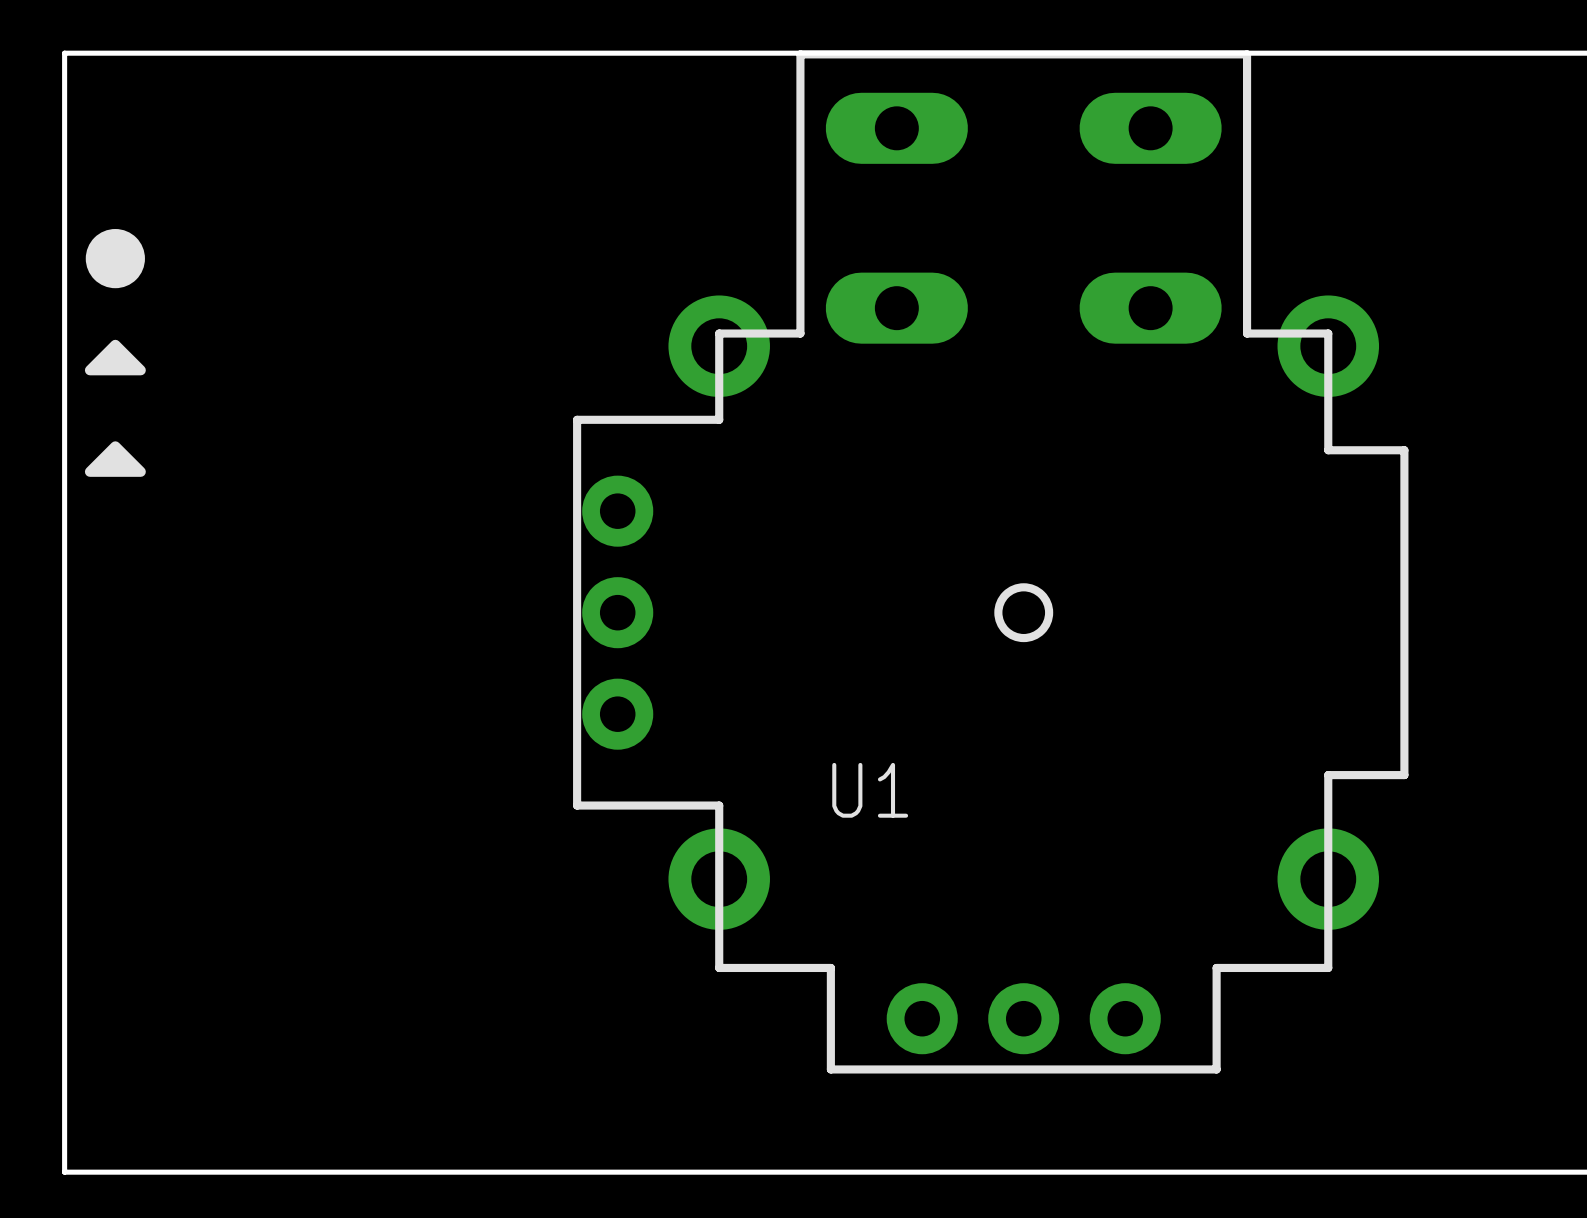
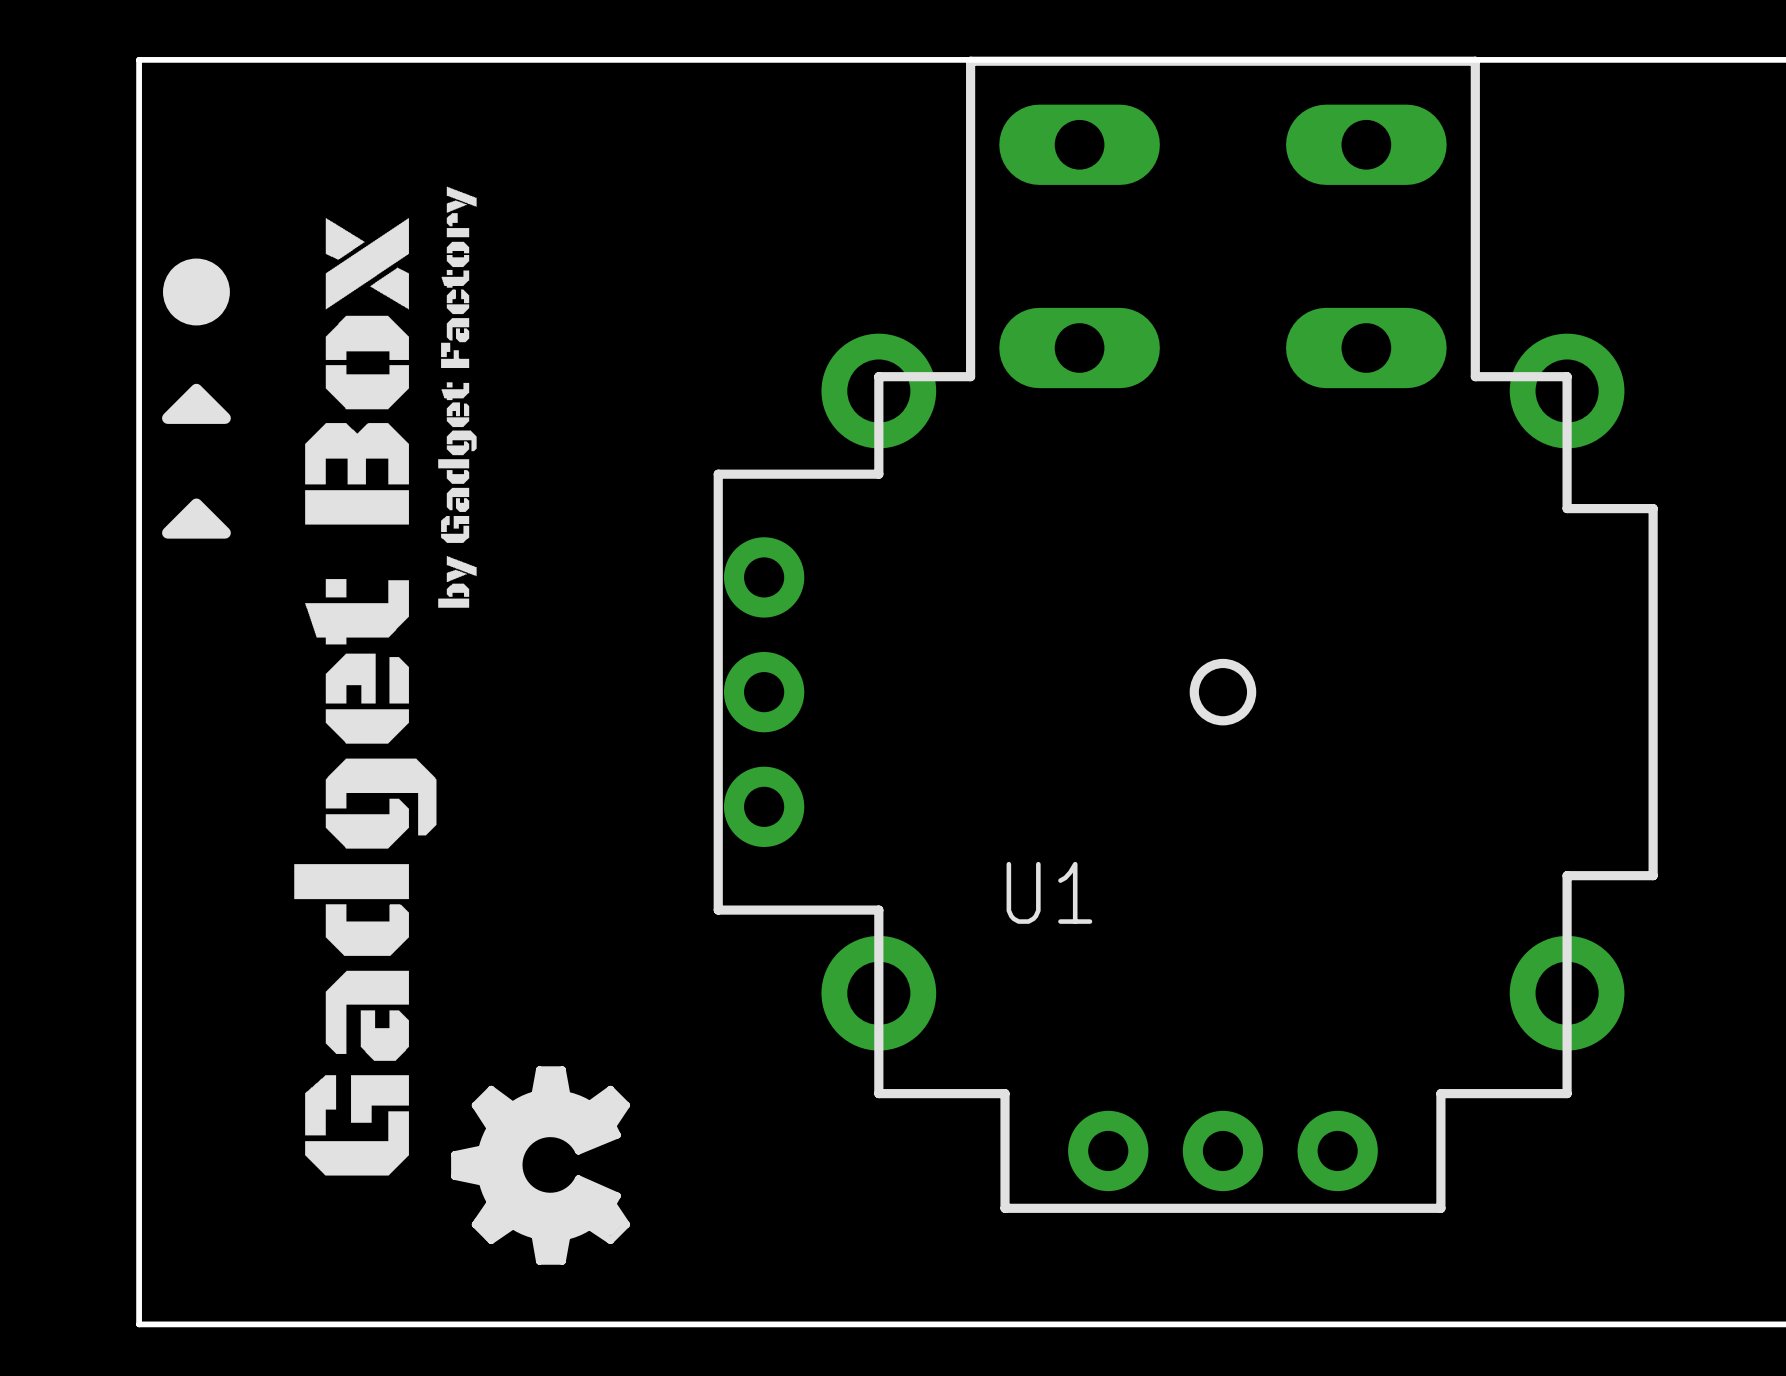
drawing: none -> [294, 186, 631, 1265]

